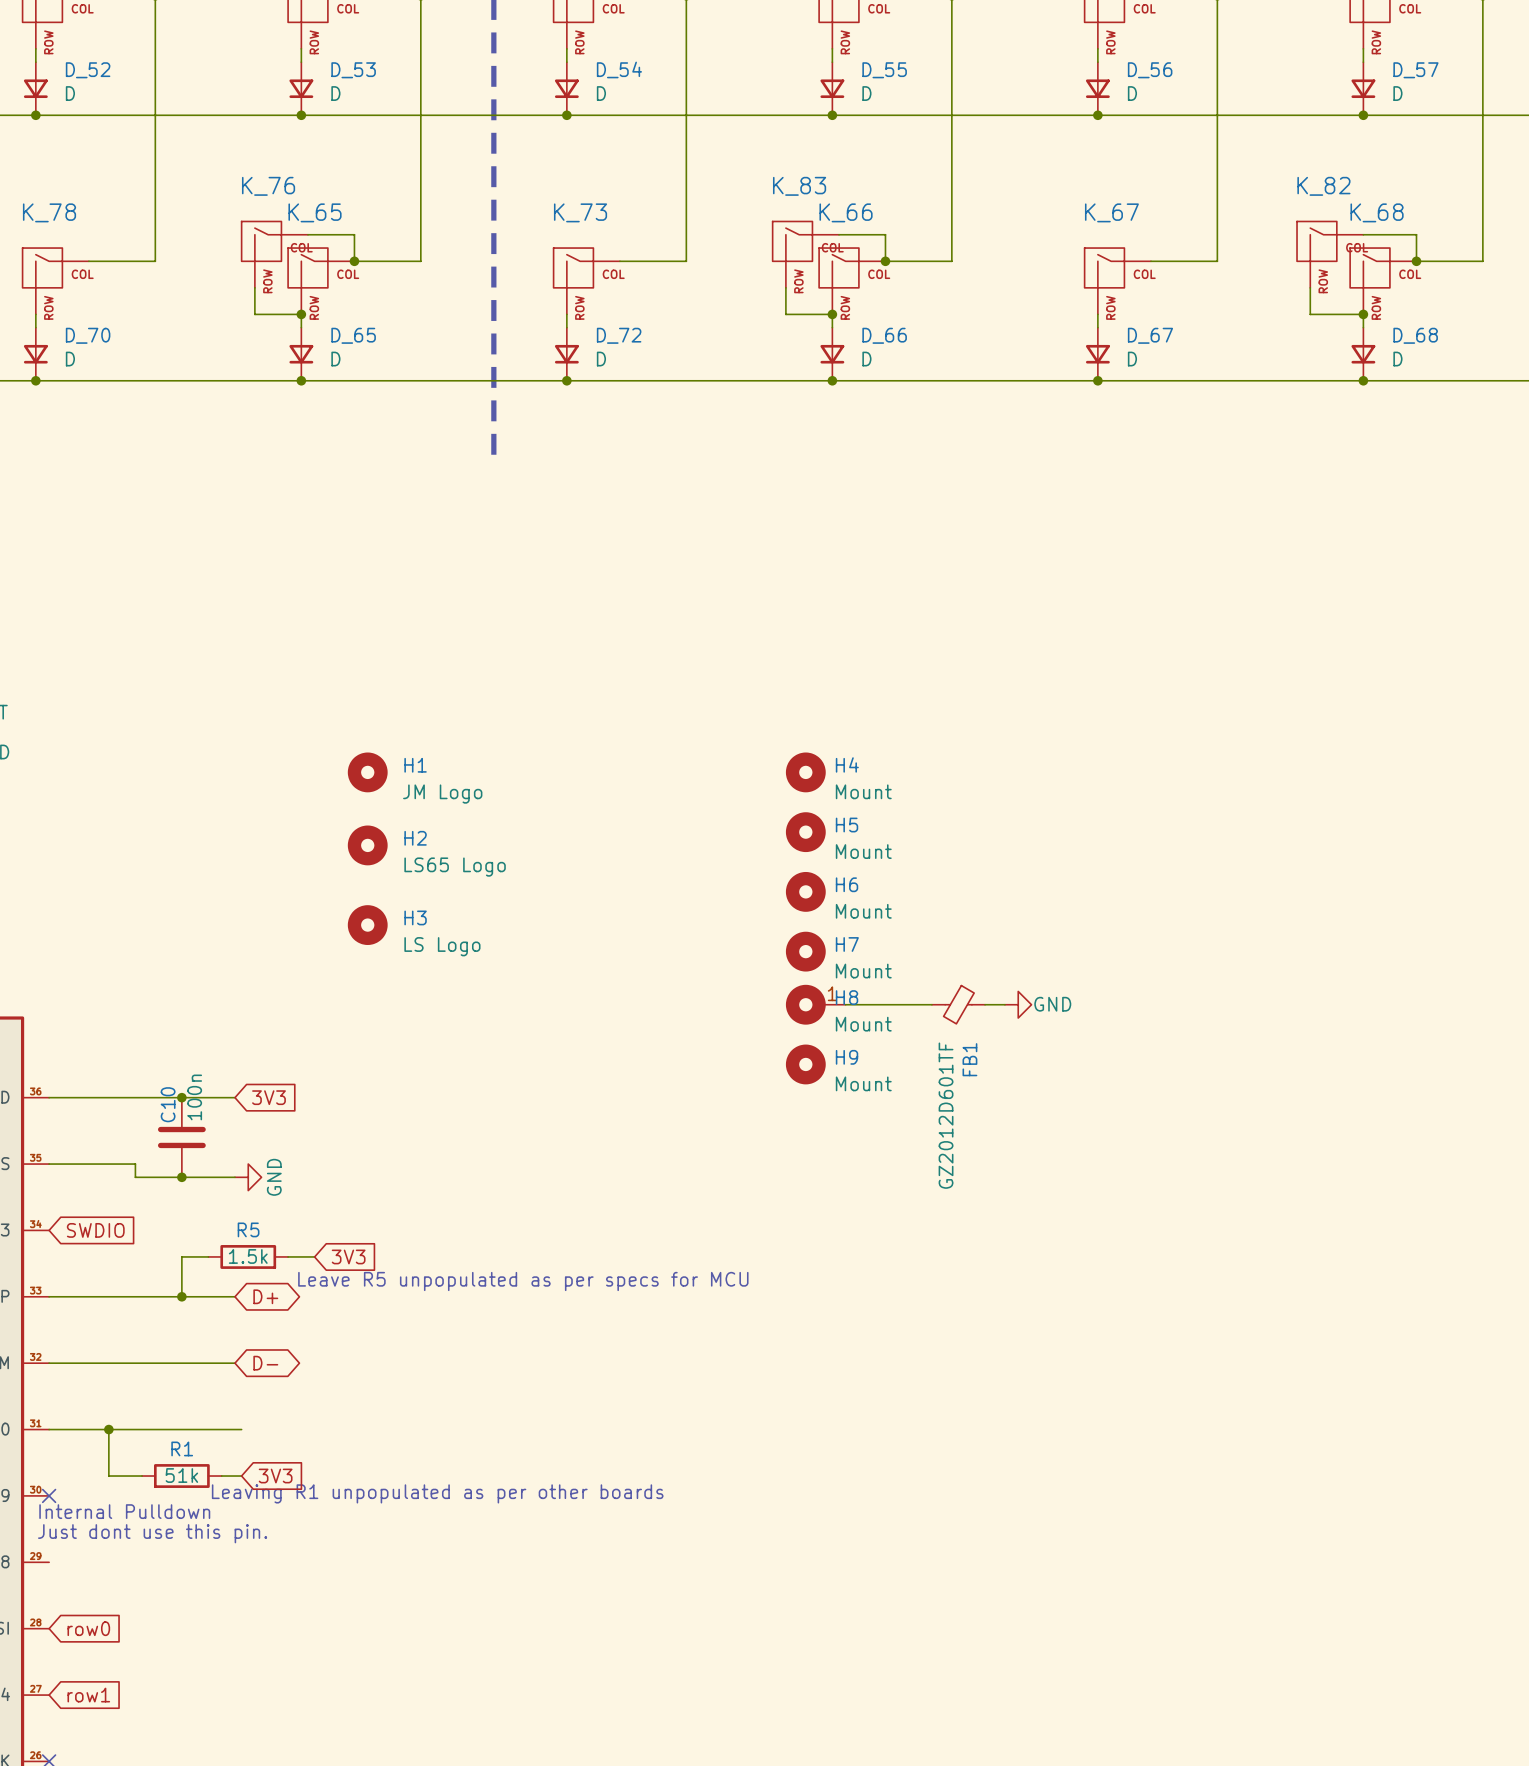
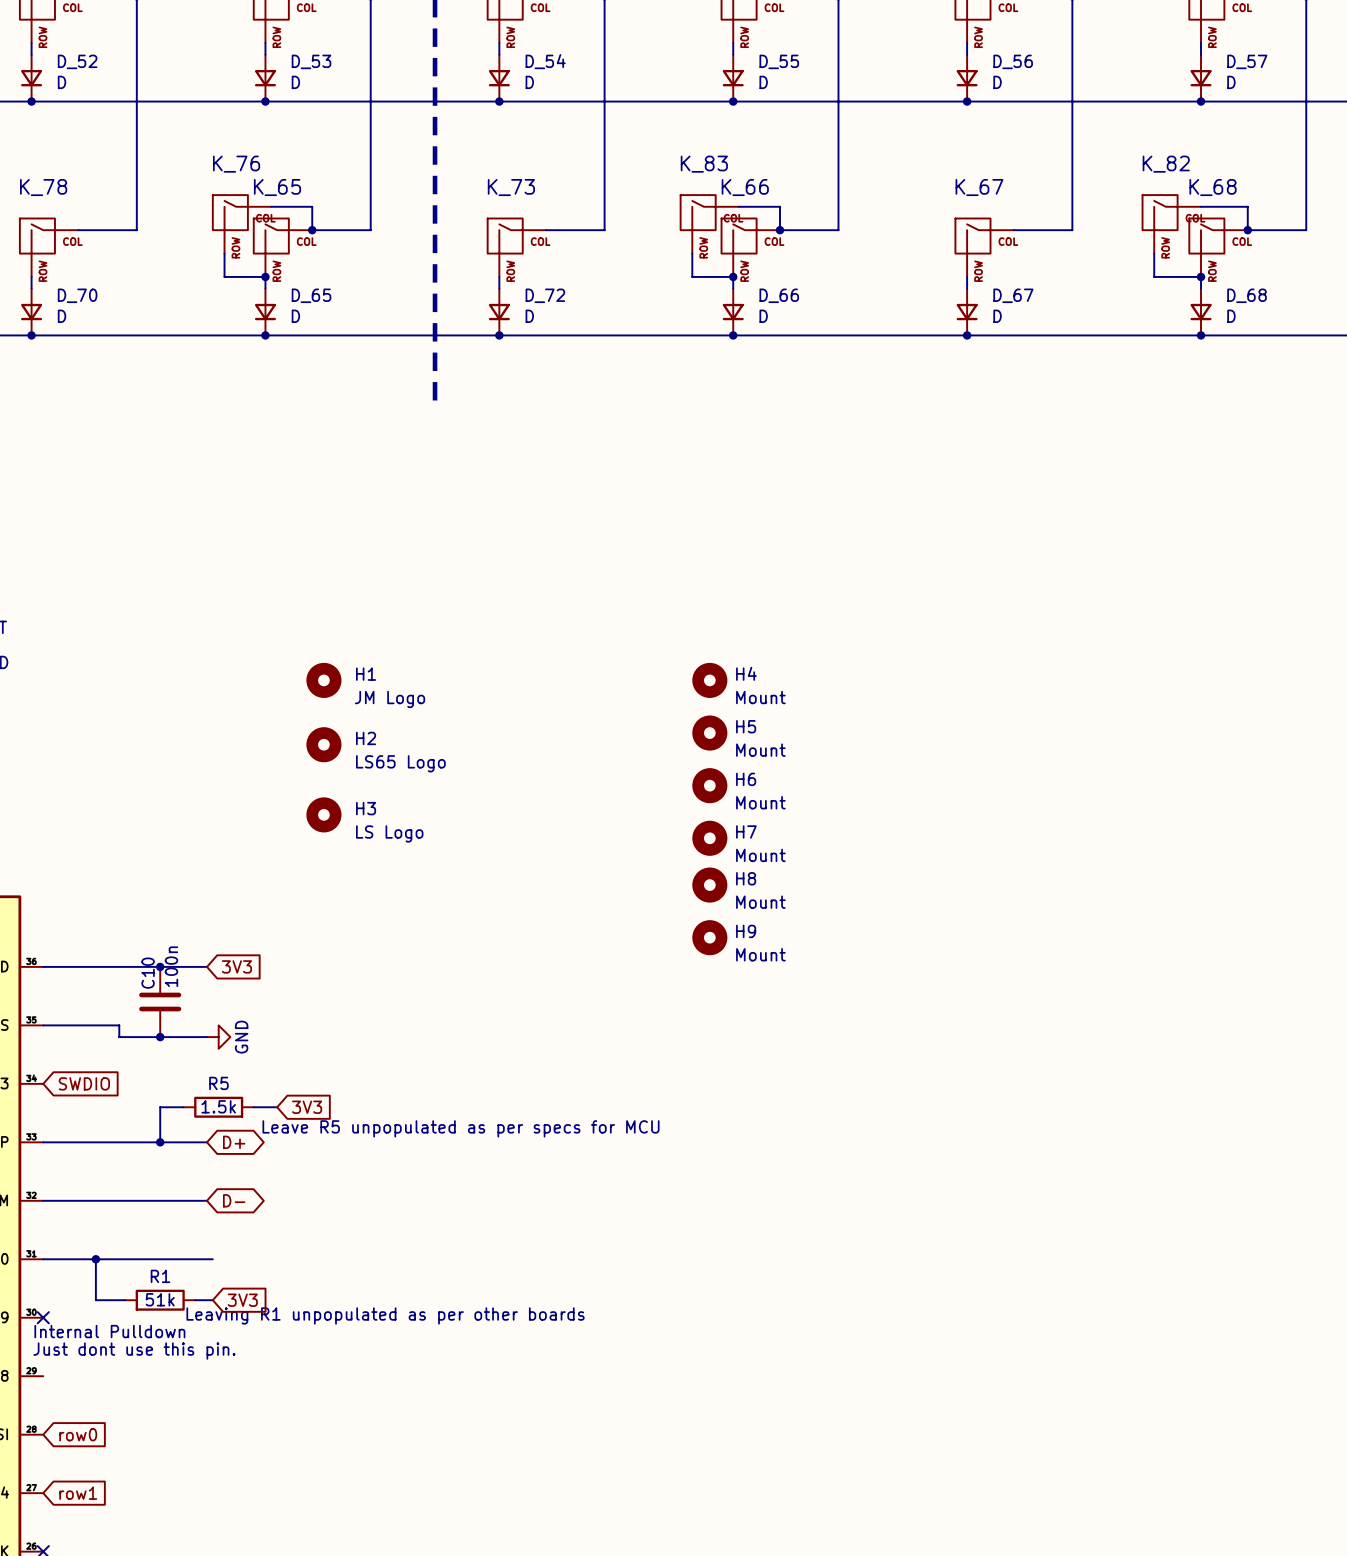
H8 symbol: [785, 984, 846, 1025] -> [692, 867, 728, 903]
wire: (845, 1004) (931, 1004) -> none
FB1: GZ2012D601TF (958, 1004) -> none
wire: (985, 1004) (1004, 1004) -> none
power symbol: GND (1018, 1004) -> none

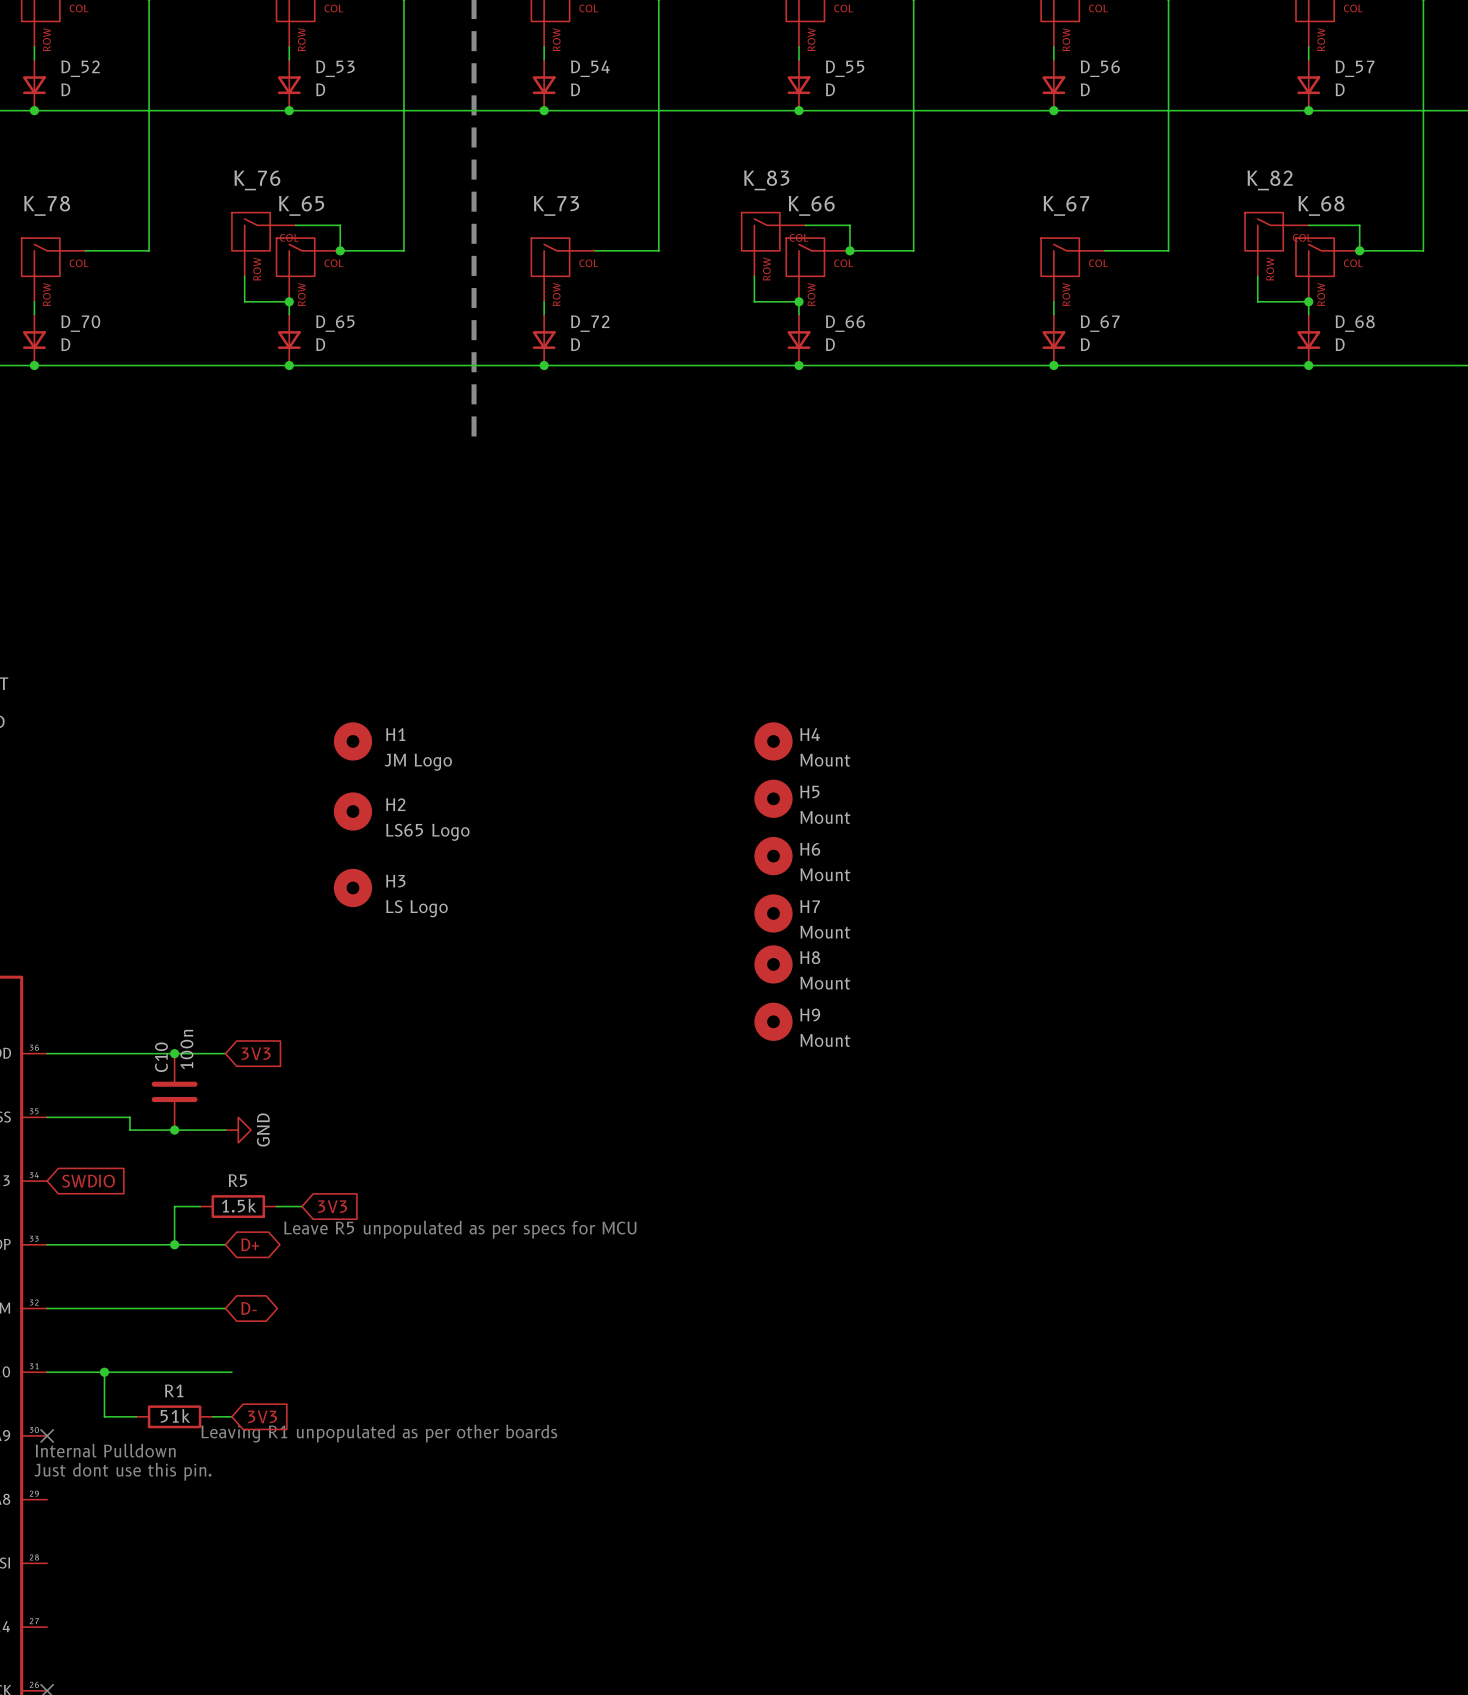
global label: row0 (78, 1434) -> none
global label: row1 (78, 1493) -> none

